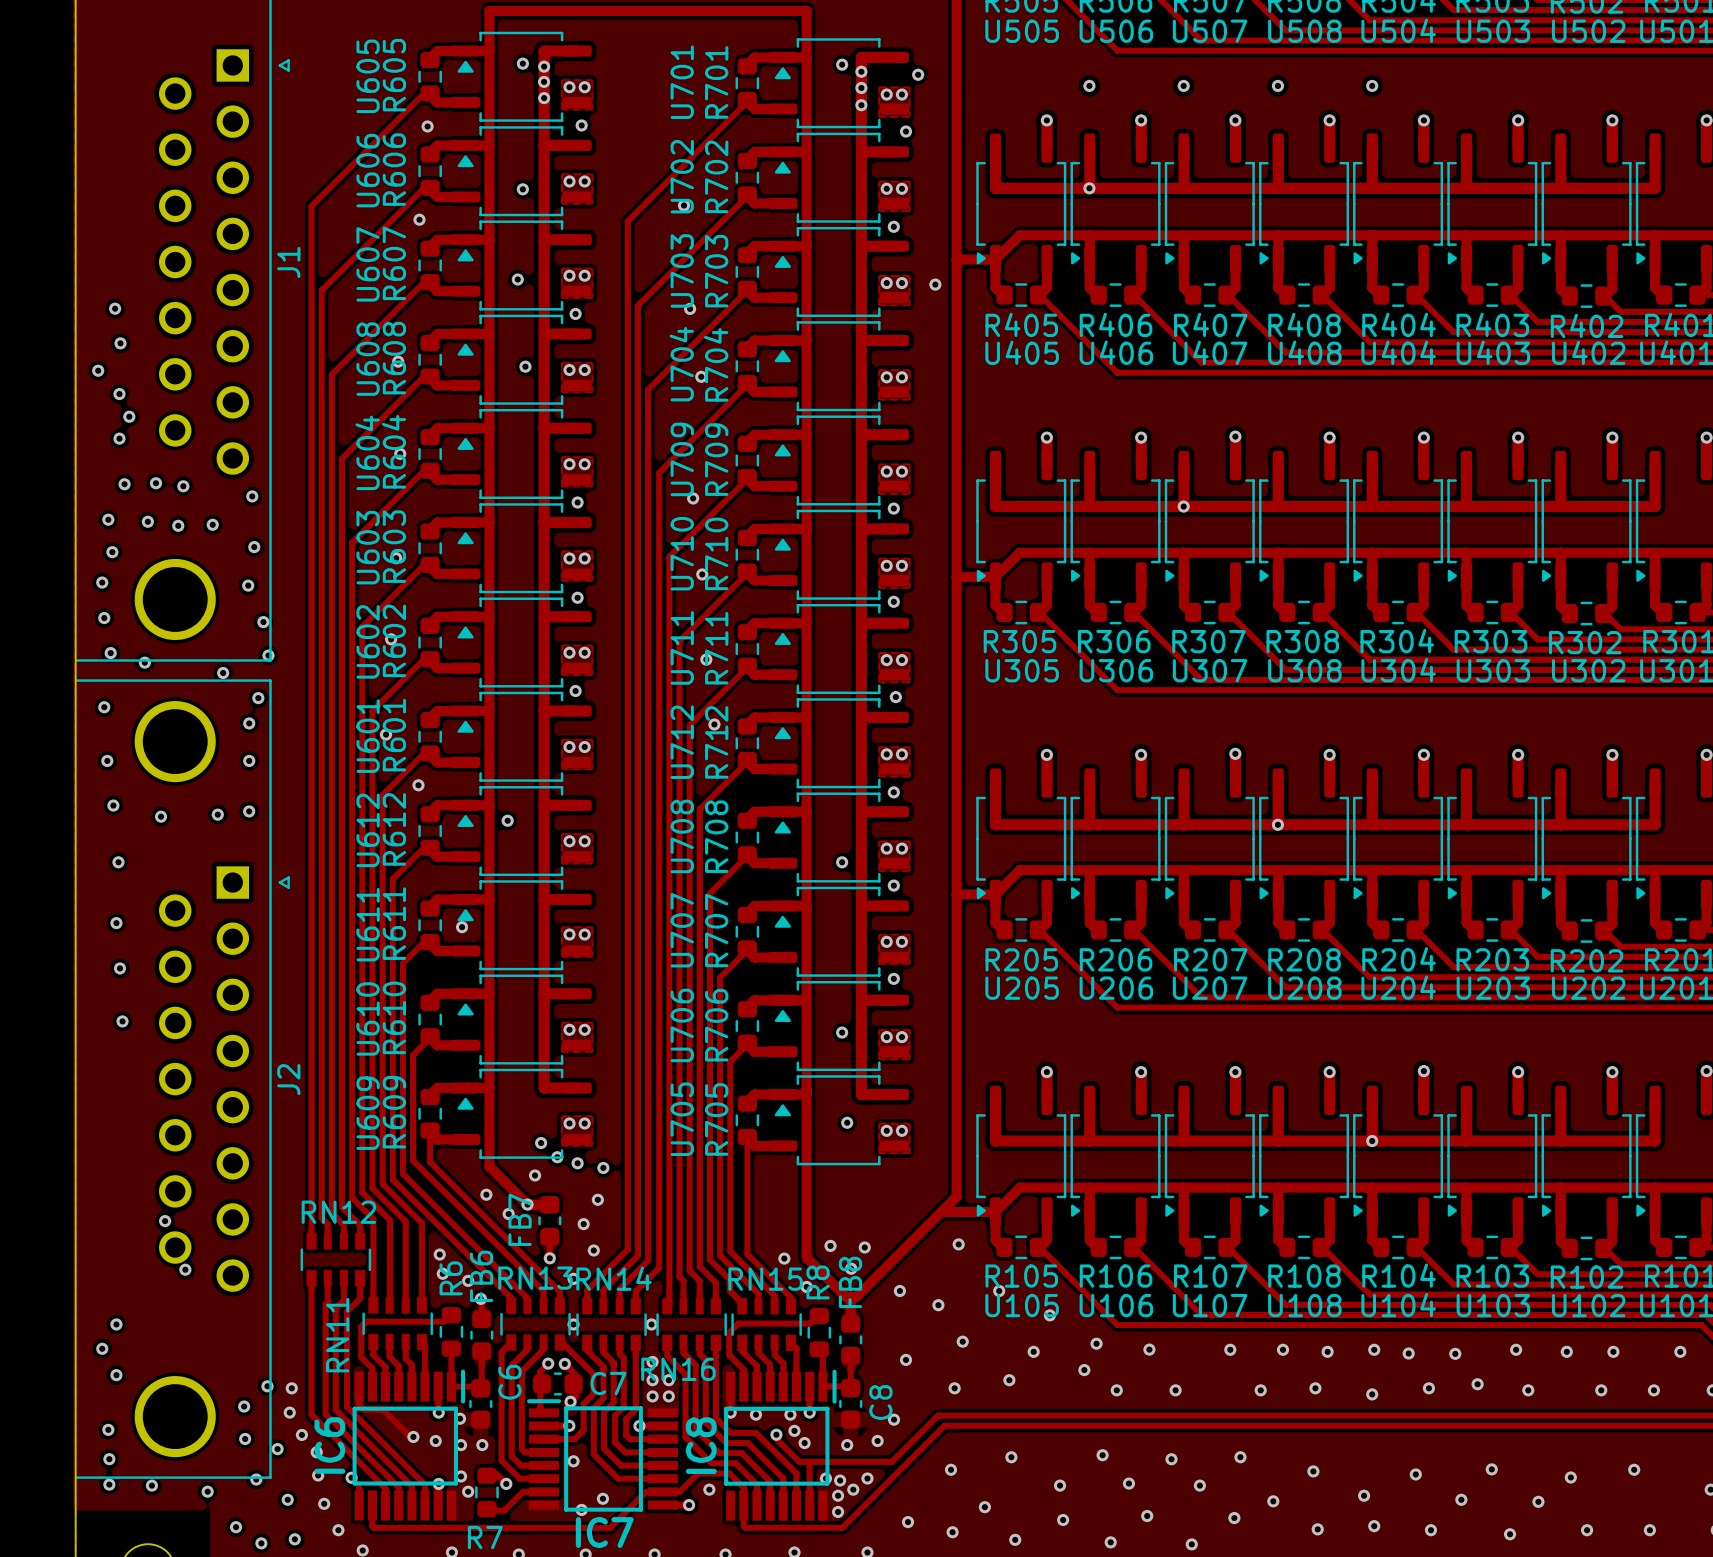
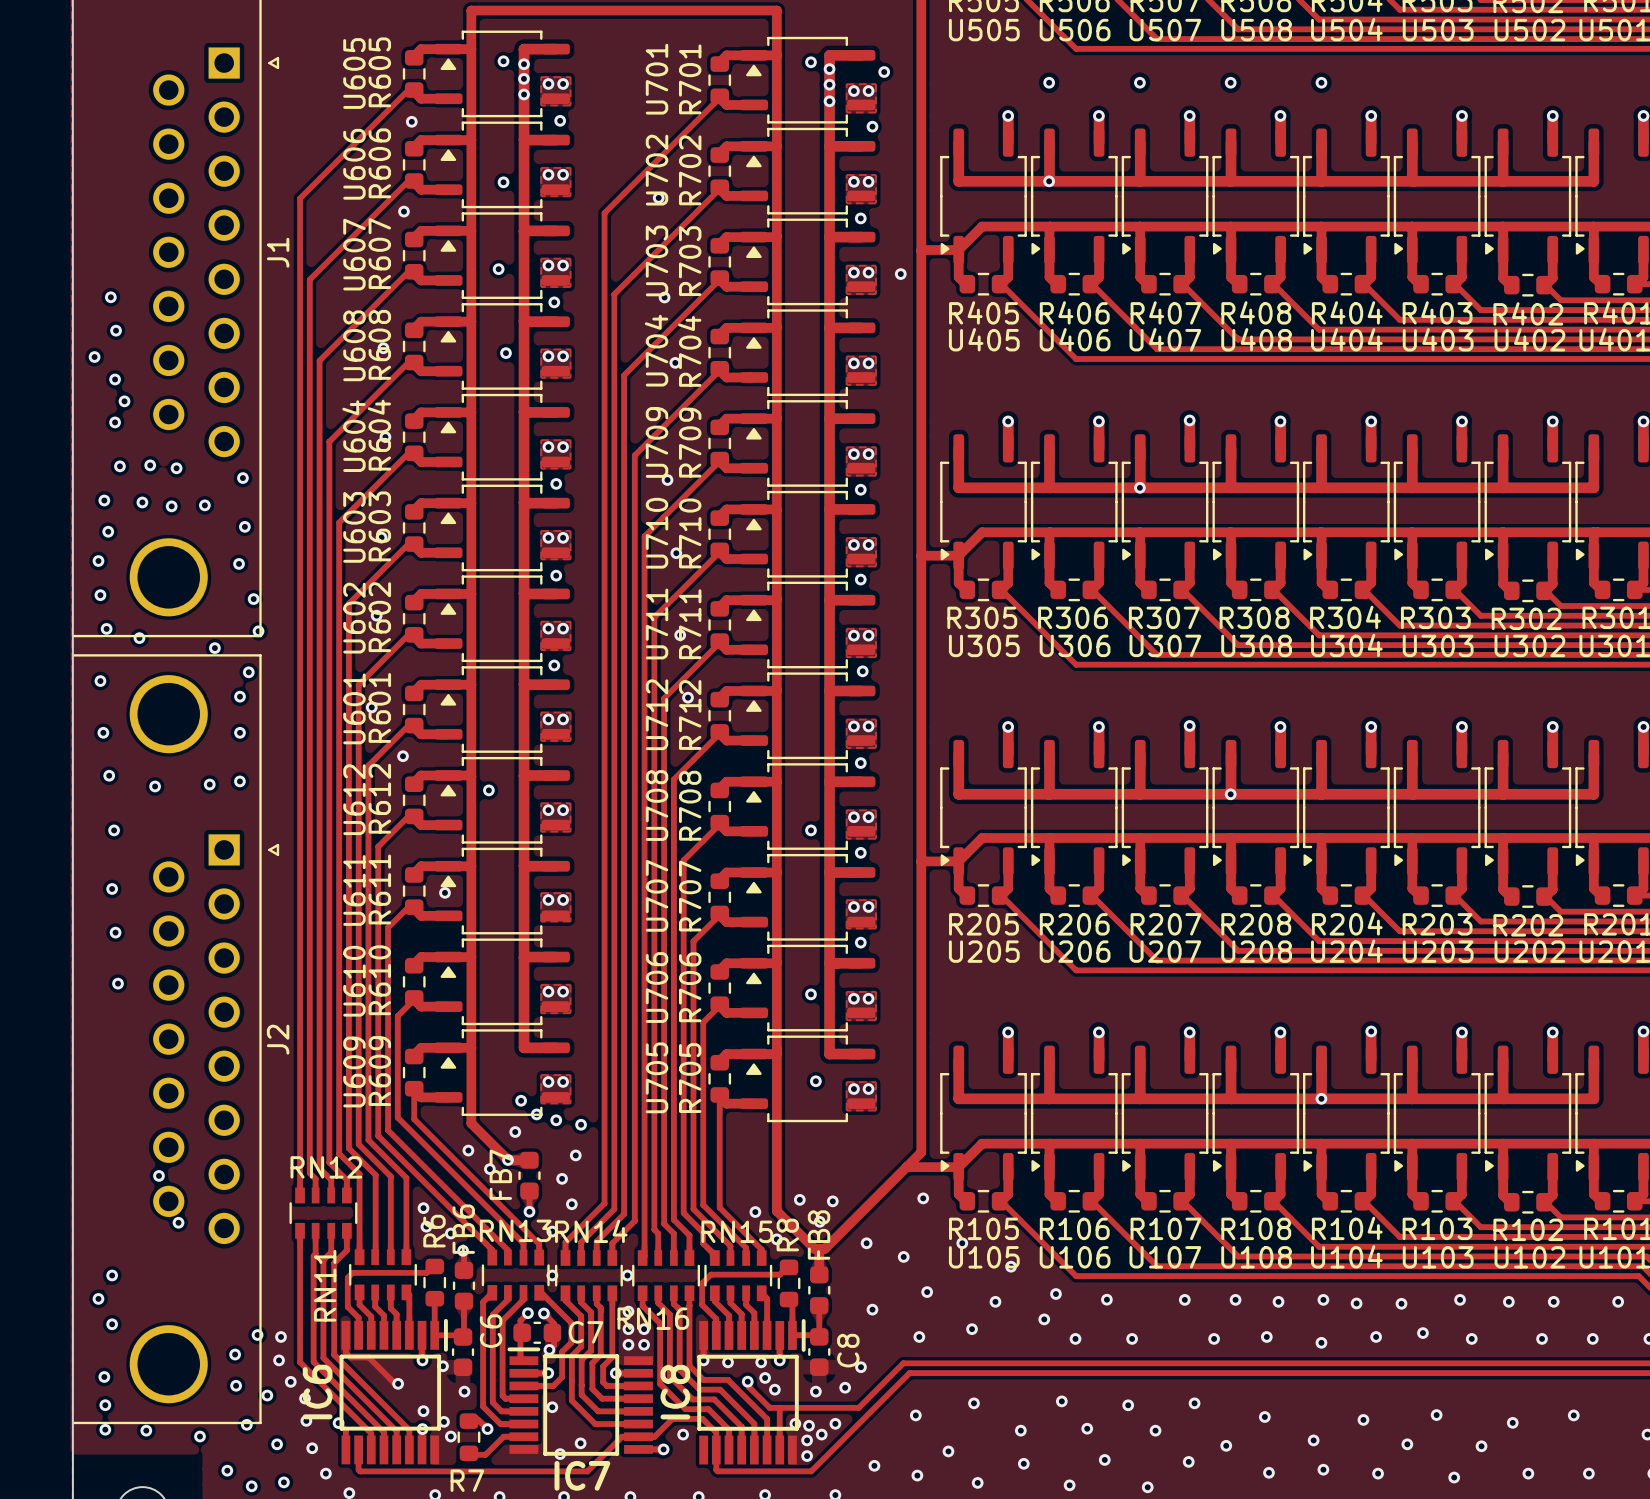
via: (435, 1441) -> none
via: (461, 1445) -> none
via: none -> (423, 1411)

